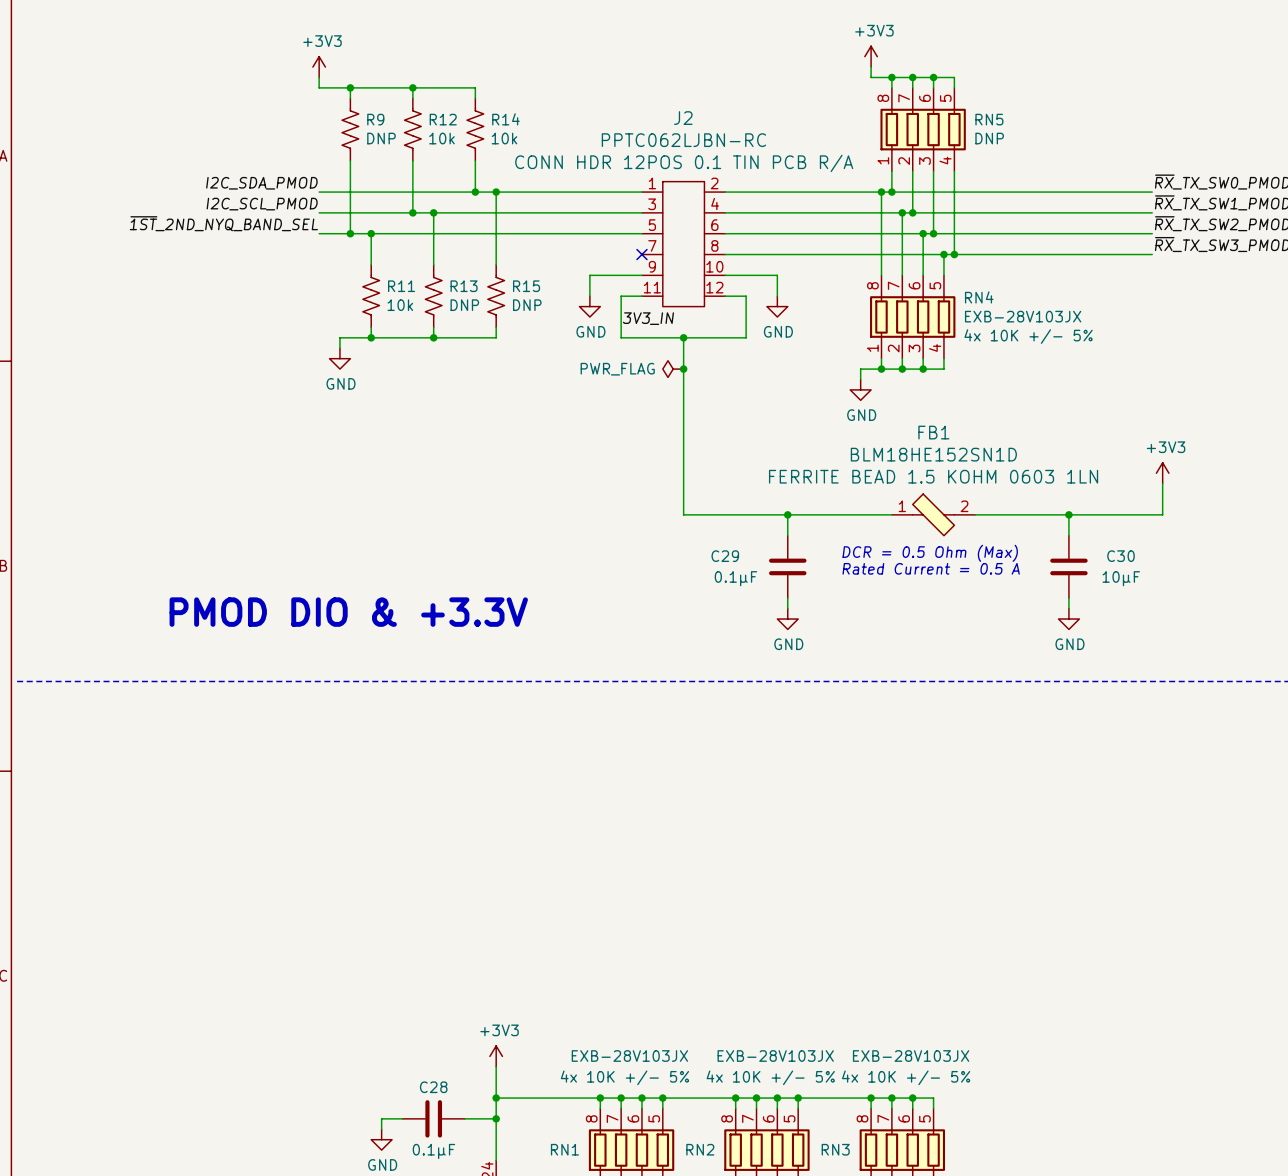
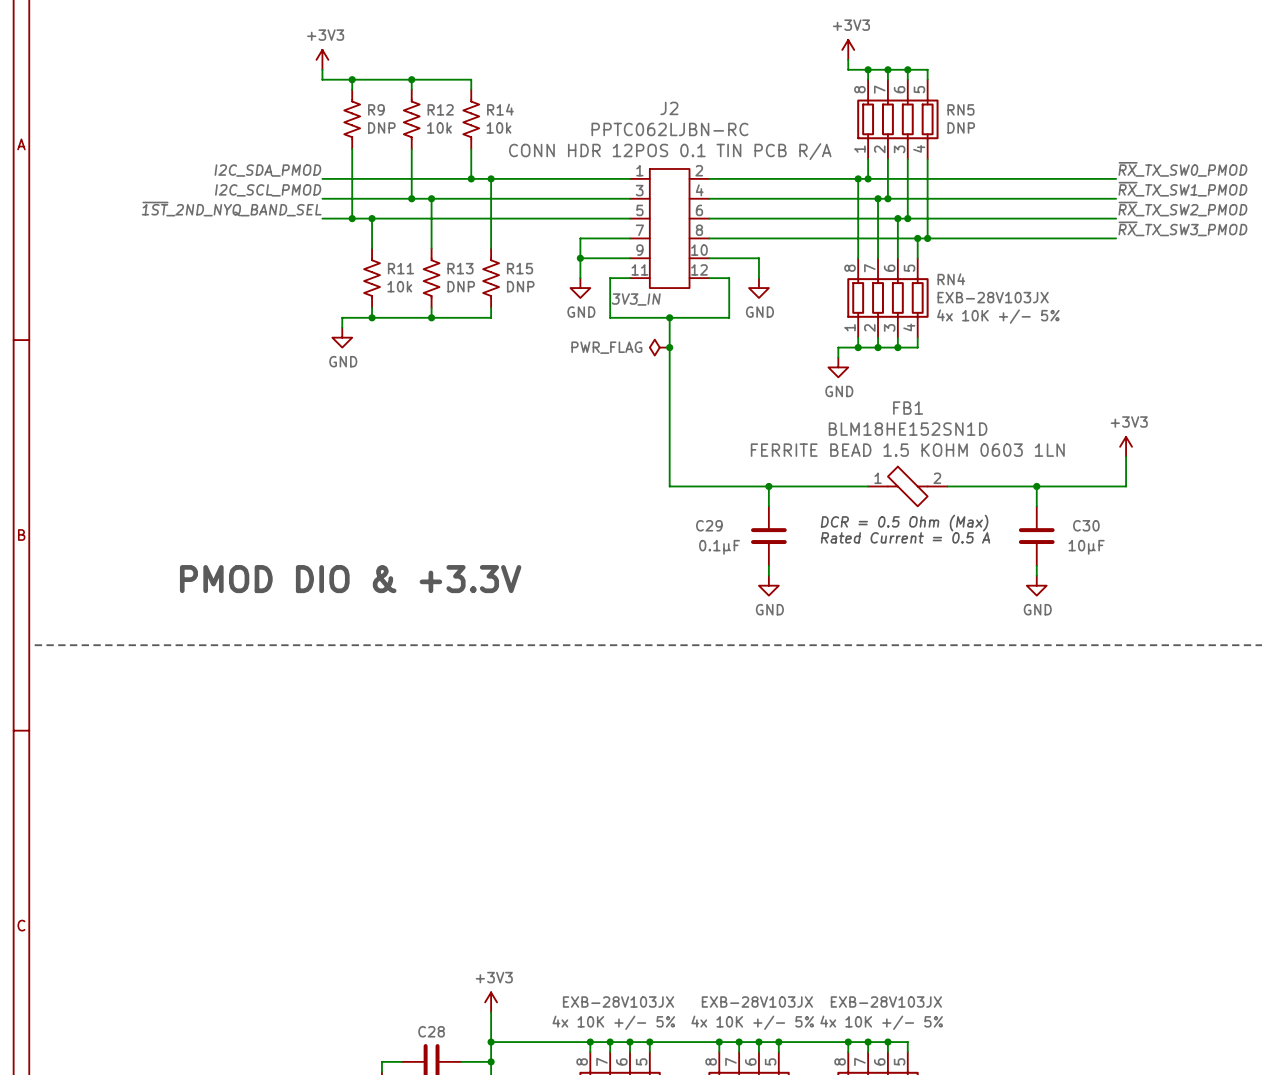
wire: none -> (629, 238) (580, 238) (580, 258)
no-connect mark: (641, 254) -> none
junction: none -> (580, 258)

